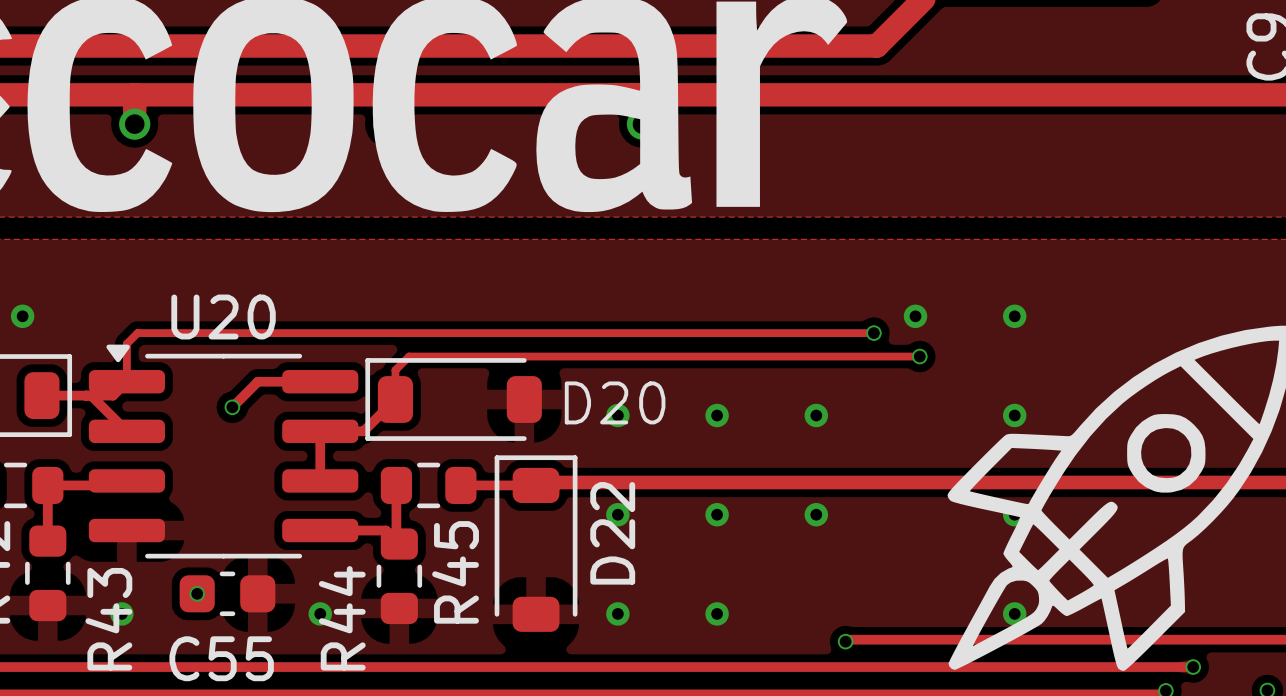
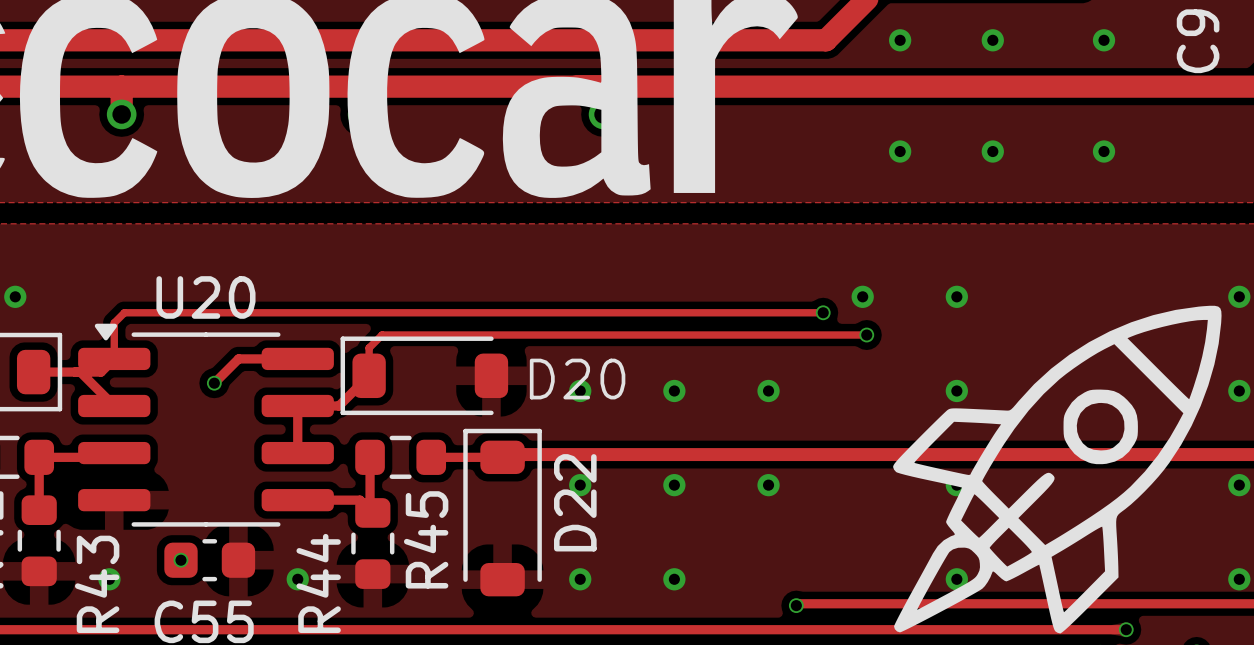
via: none -> (900, 40)
via: none -> (992, 40)
via: none -> (1104, 40)
via: none -> (900, 151)
via: none -> (992, 151)
via: none -> (1104, 151)

